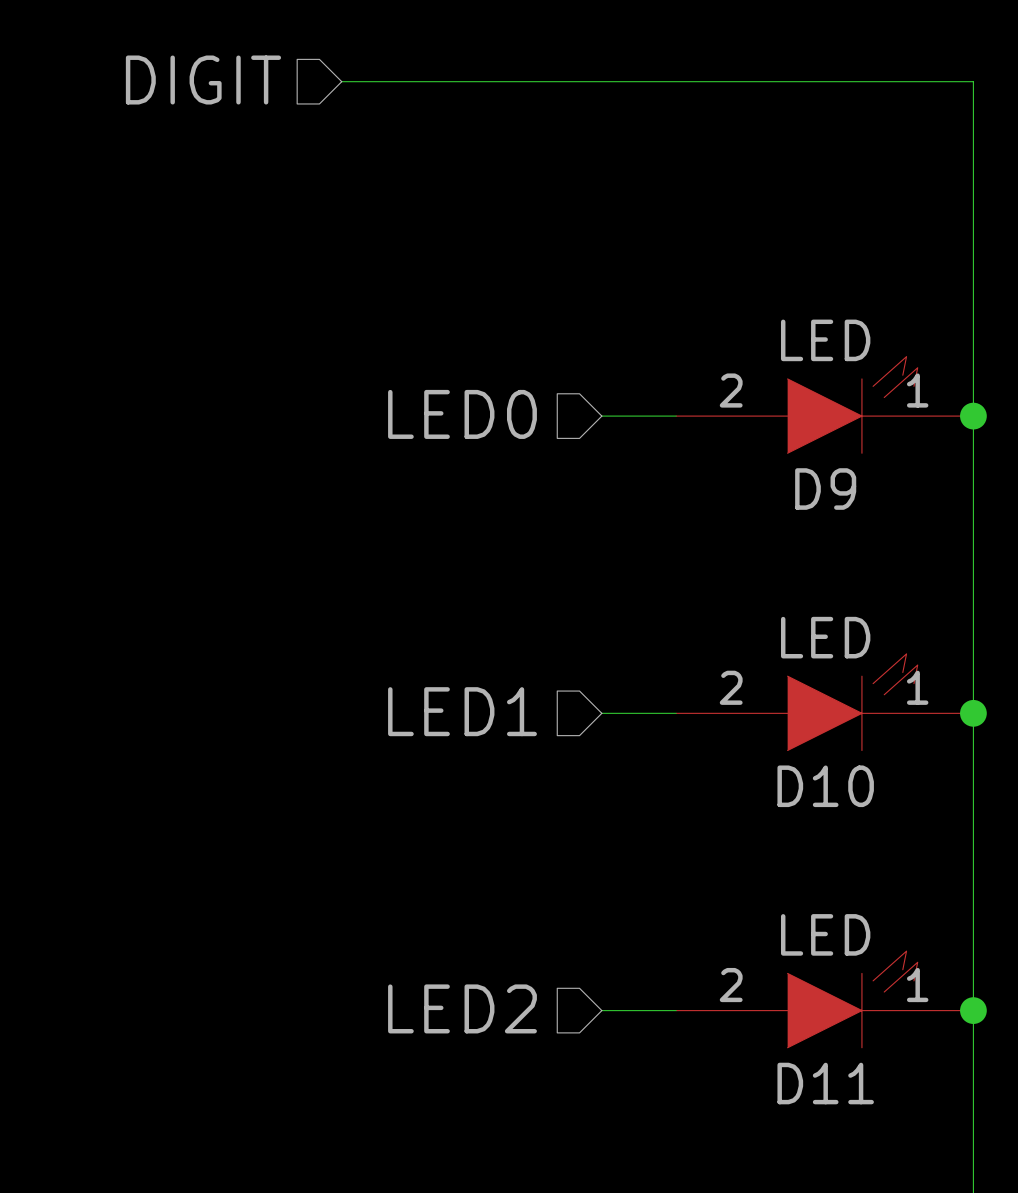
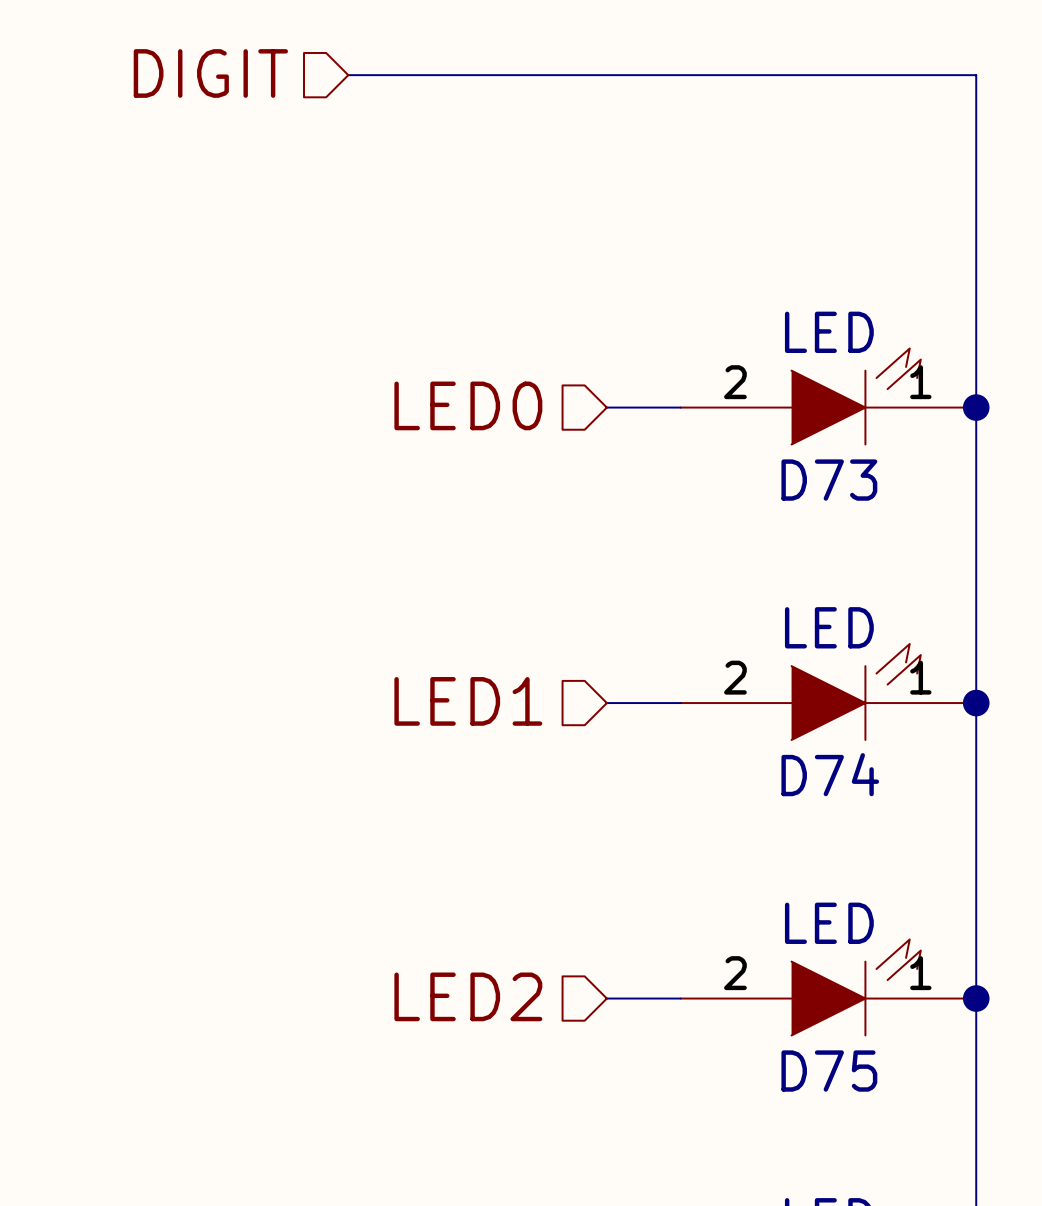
D9 name: D9 (825, 489) -> D73 (829, 480)
D10 name: D10 (825, 786) -> D74 (830, 774)
D11 name: D11 (825, 1083) -> D75 (829, 1071)

